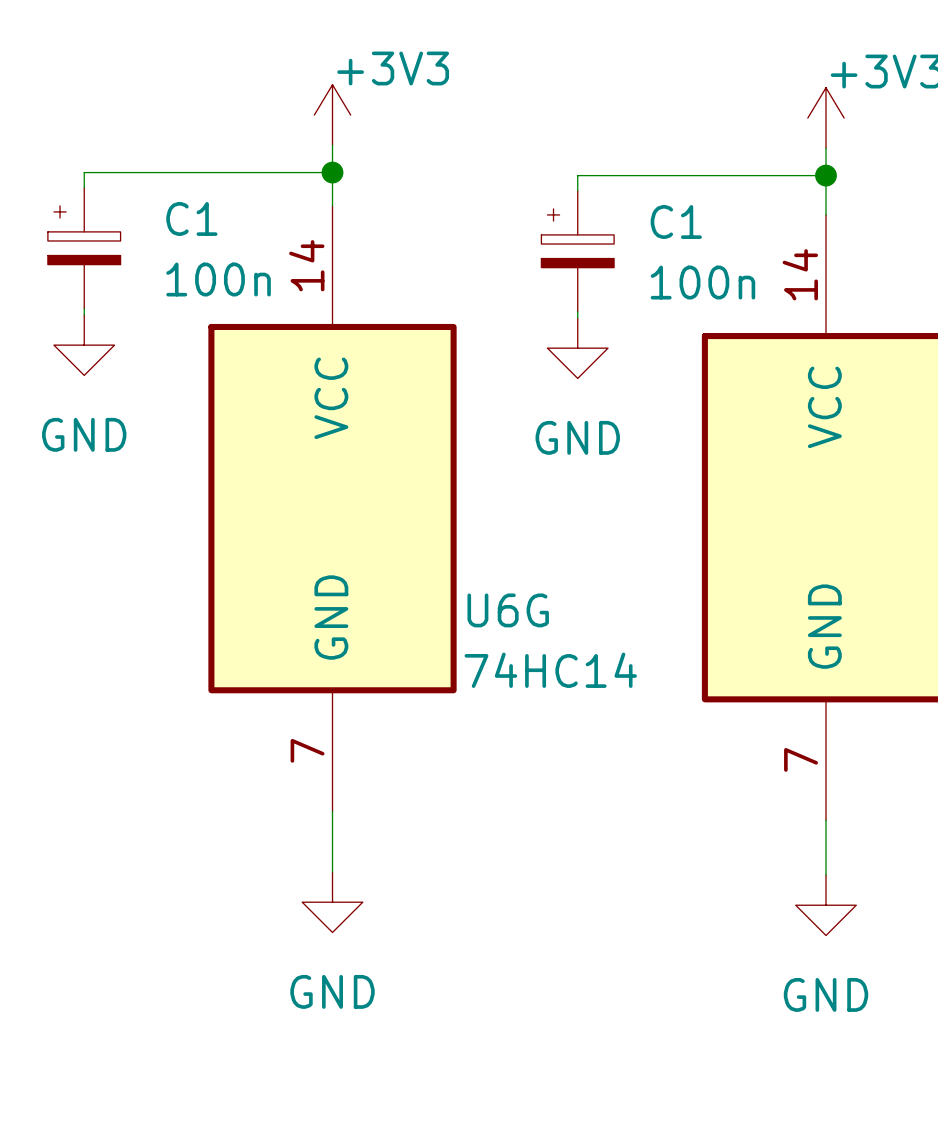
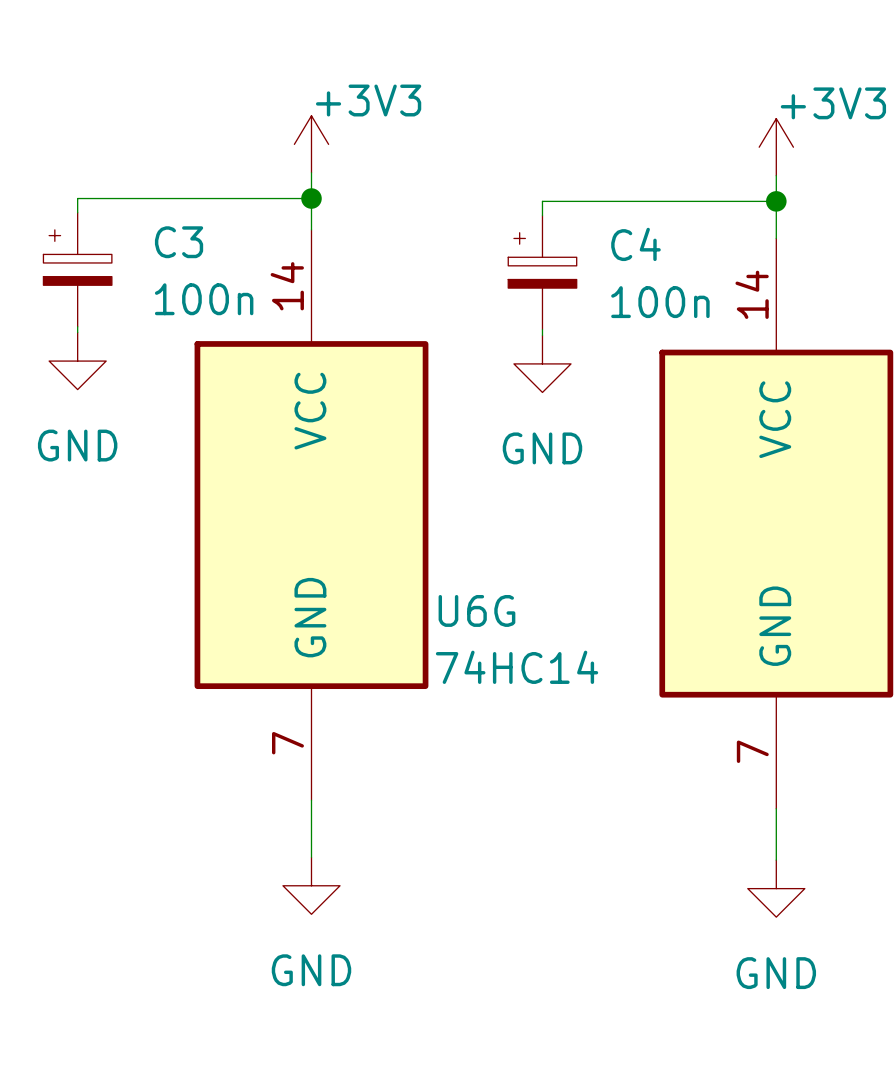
C1 name: C1 (191, 218) -> C3 (179, 242)
C1 name: C1 (676, 221) -> C4 (635, 244)

